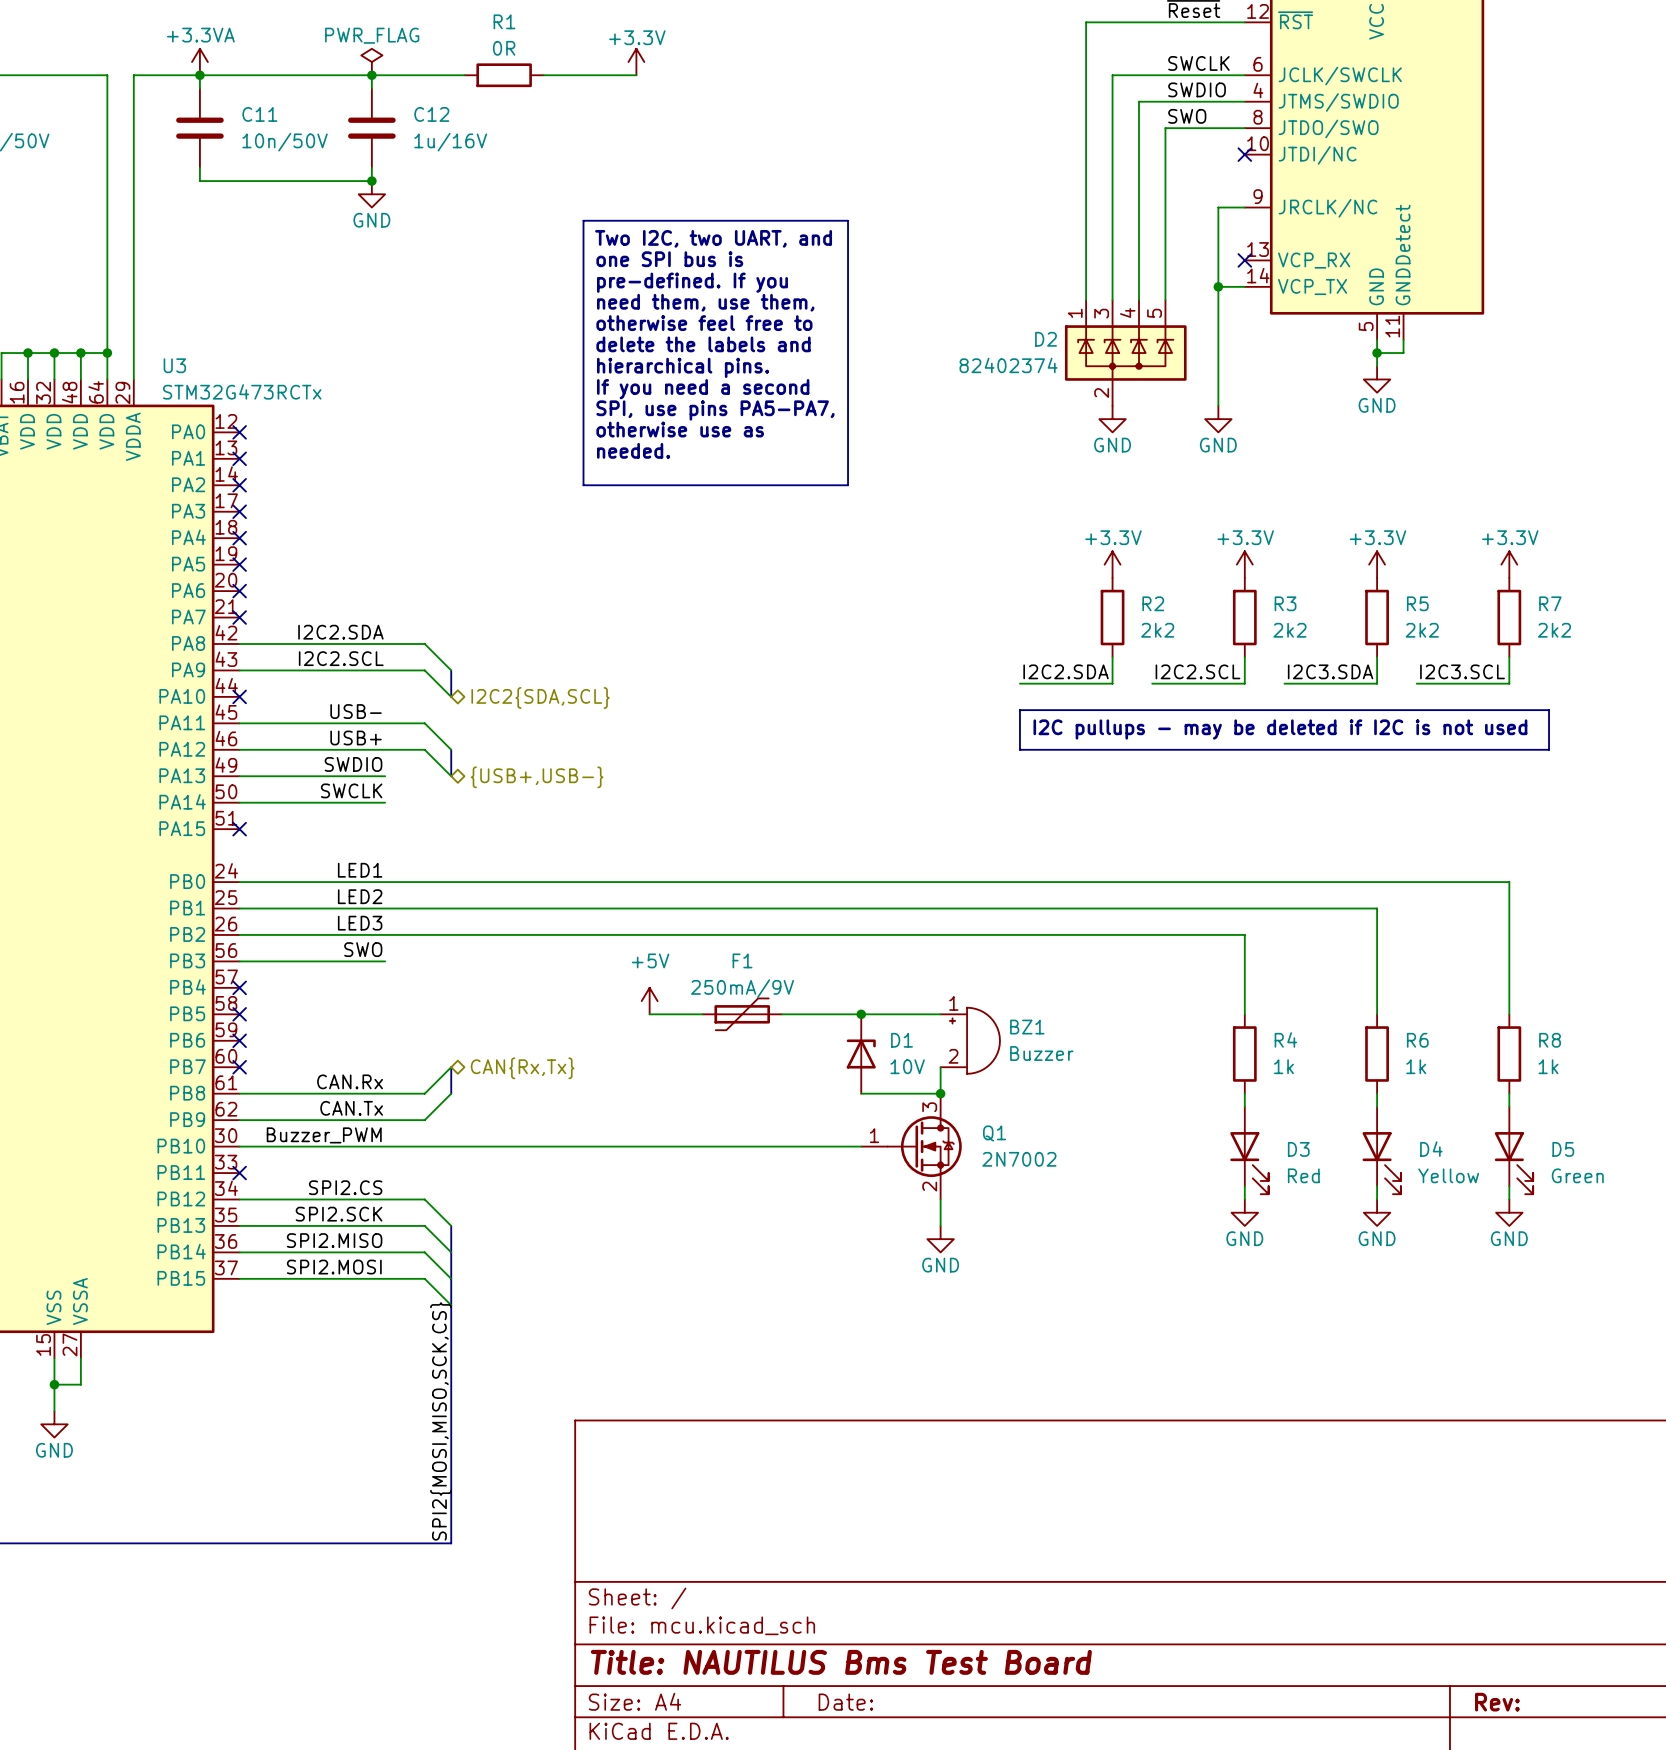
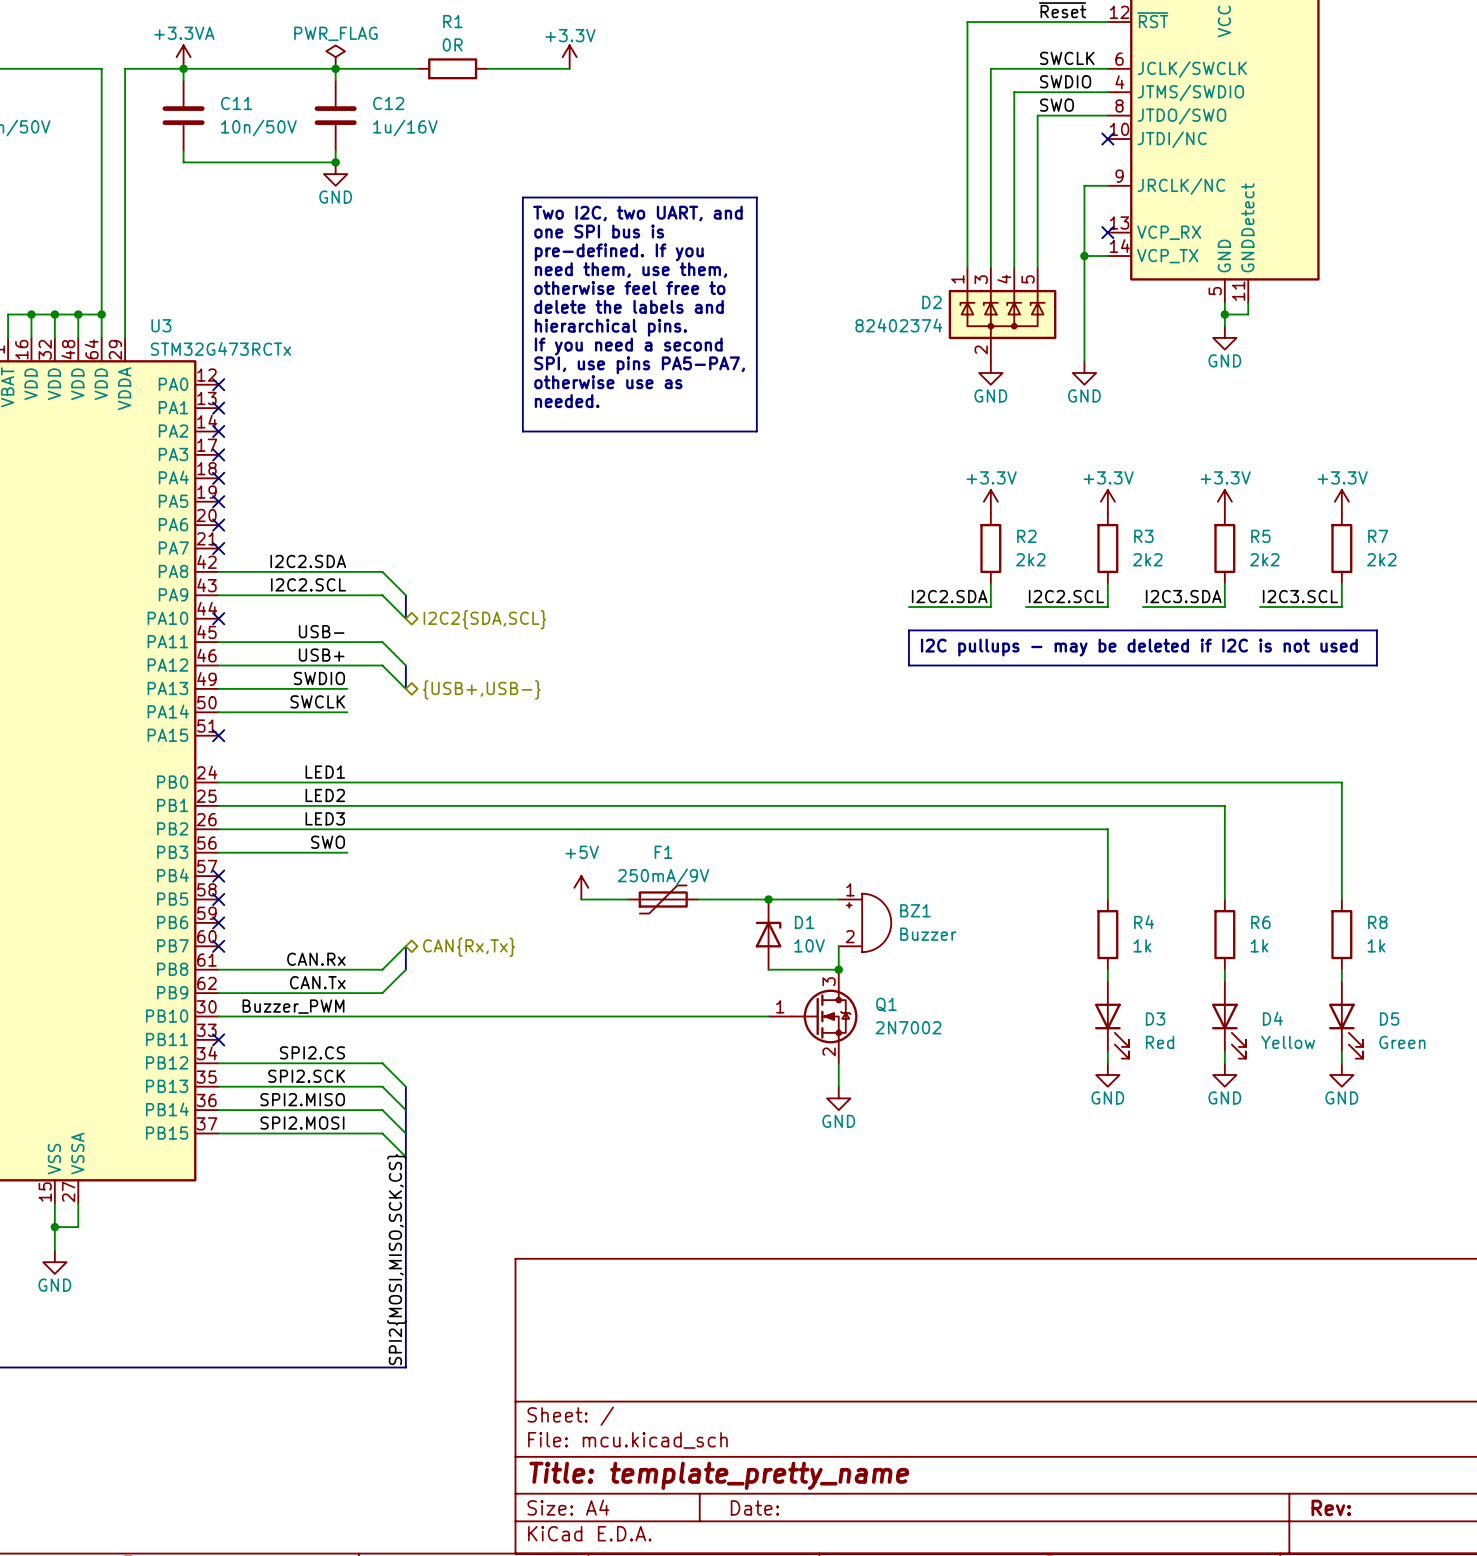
title block: Title: NAUTILUS Bms Test Board (841, 1662) -> Title: template_pretty_name (719, 1475)

